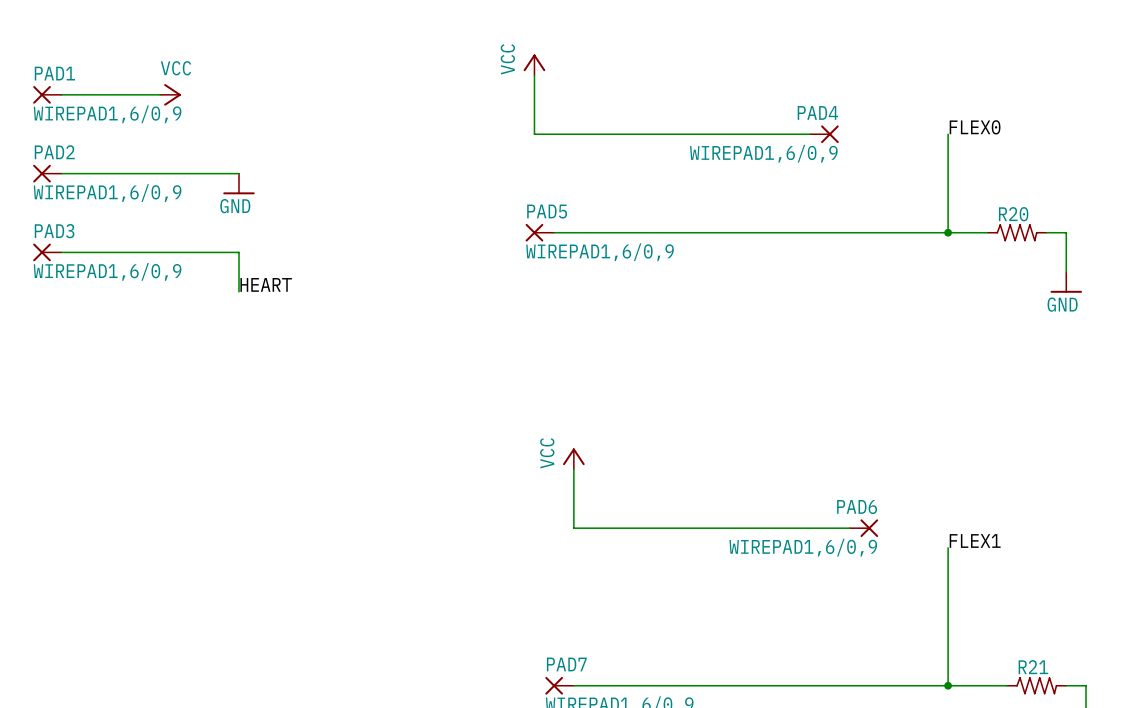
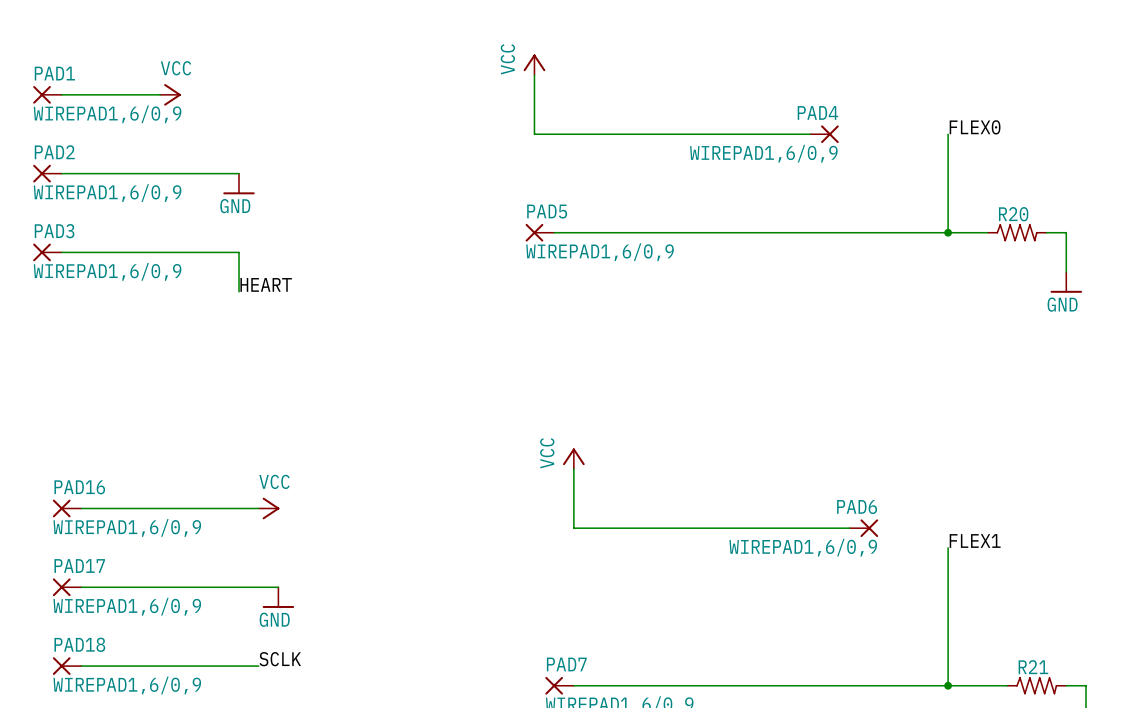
PAD16: none -> WIREPAD1,6/0,9 (67, 508)
wire: none -> (81, 508) (258, 508)
power symbol: none -> VCC (269, 508)
PAD17: none -> WIREPAD1,6/0,9 (67, 587)
wire: none -> (81, 587) (278, 587)
power symbol: none -> GND (278, 597)
label: none -> SCLK (280, 659)
PAD18: none -> WIREPAD1,6/0,9 (67, 666)
wire: none -> (81, 666) (258, 666)

